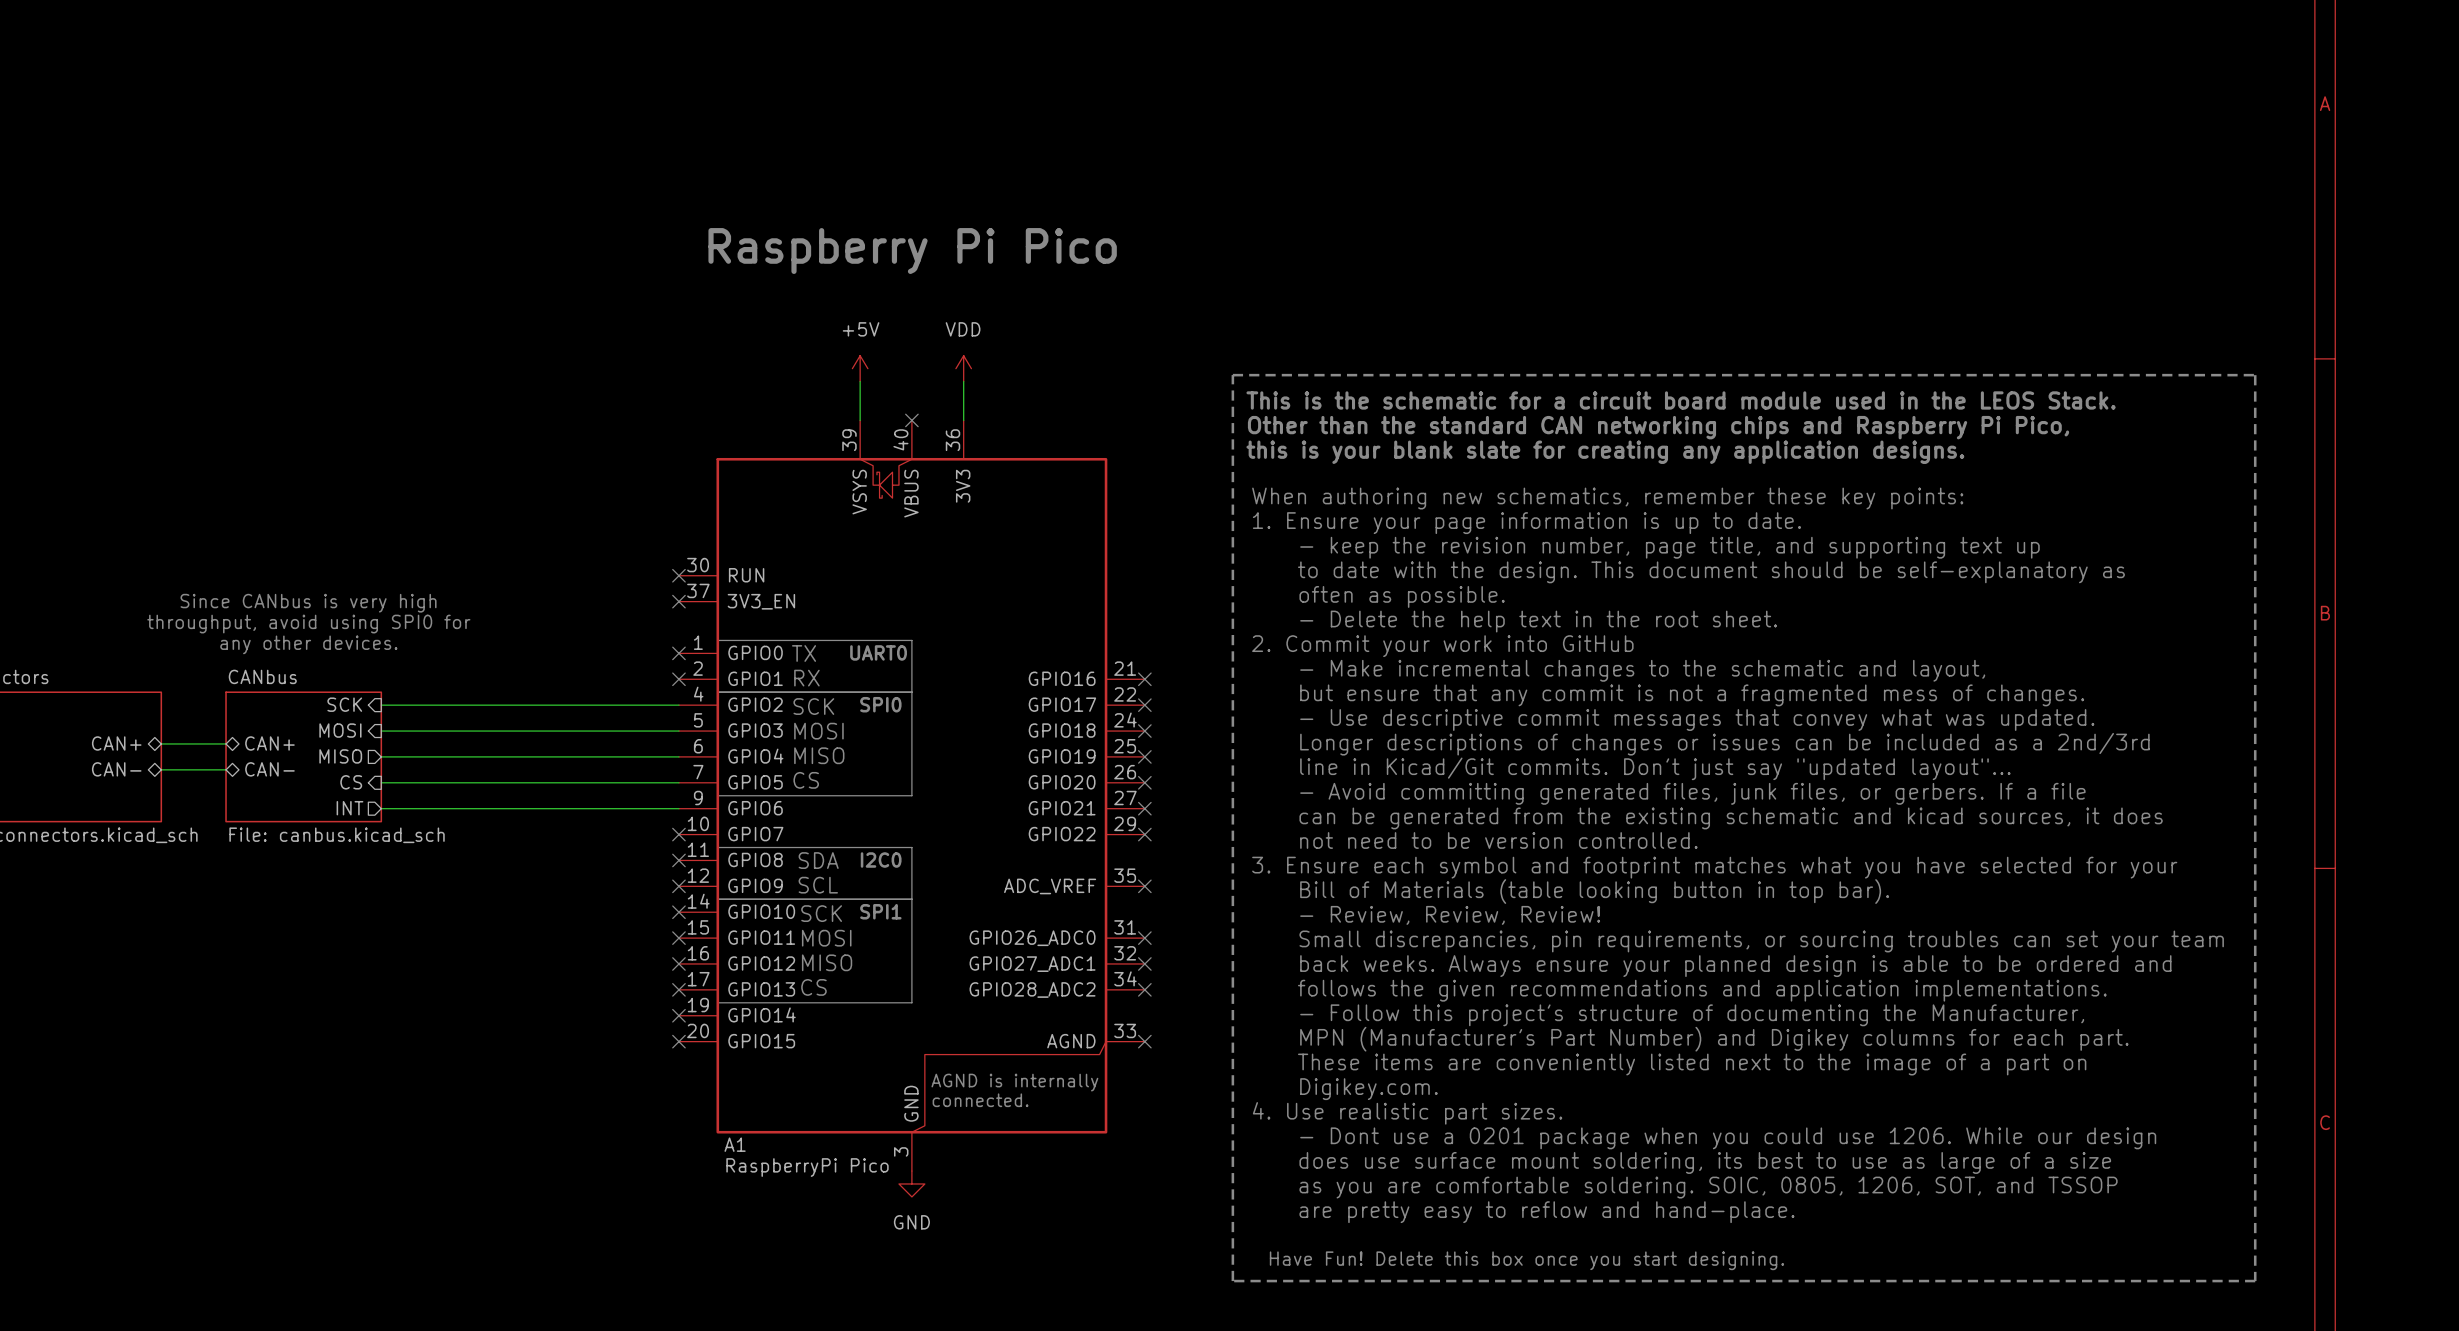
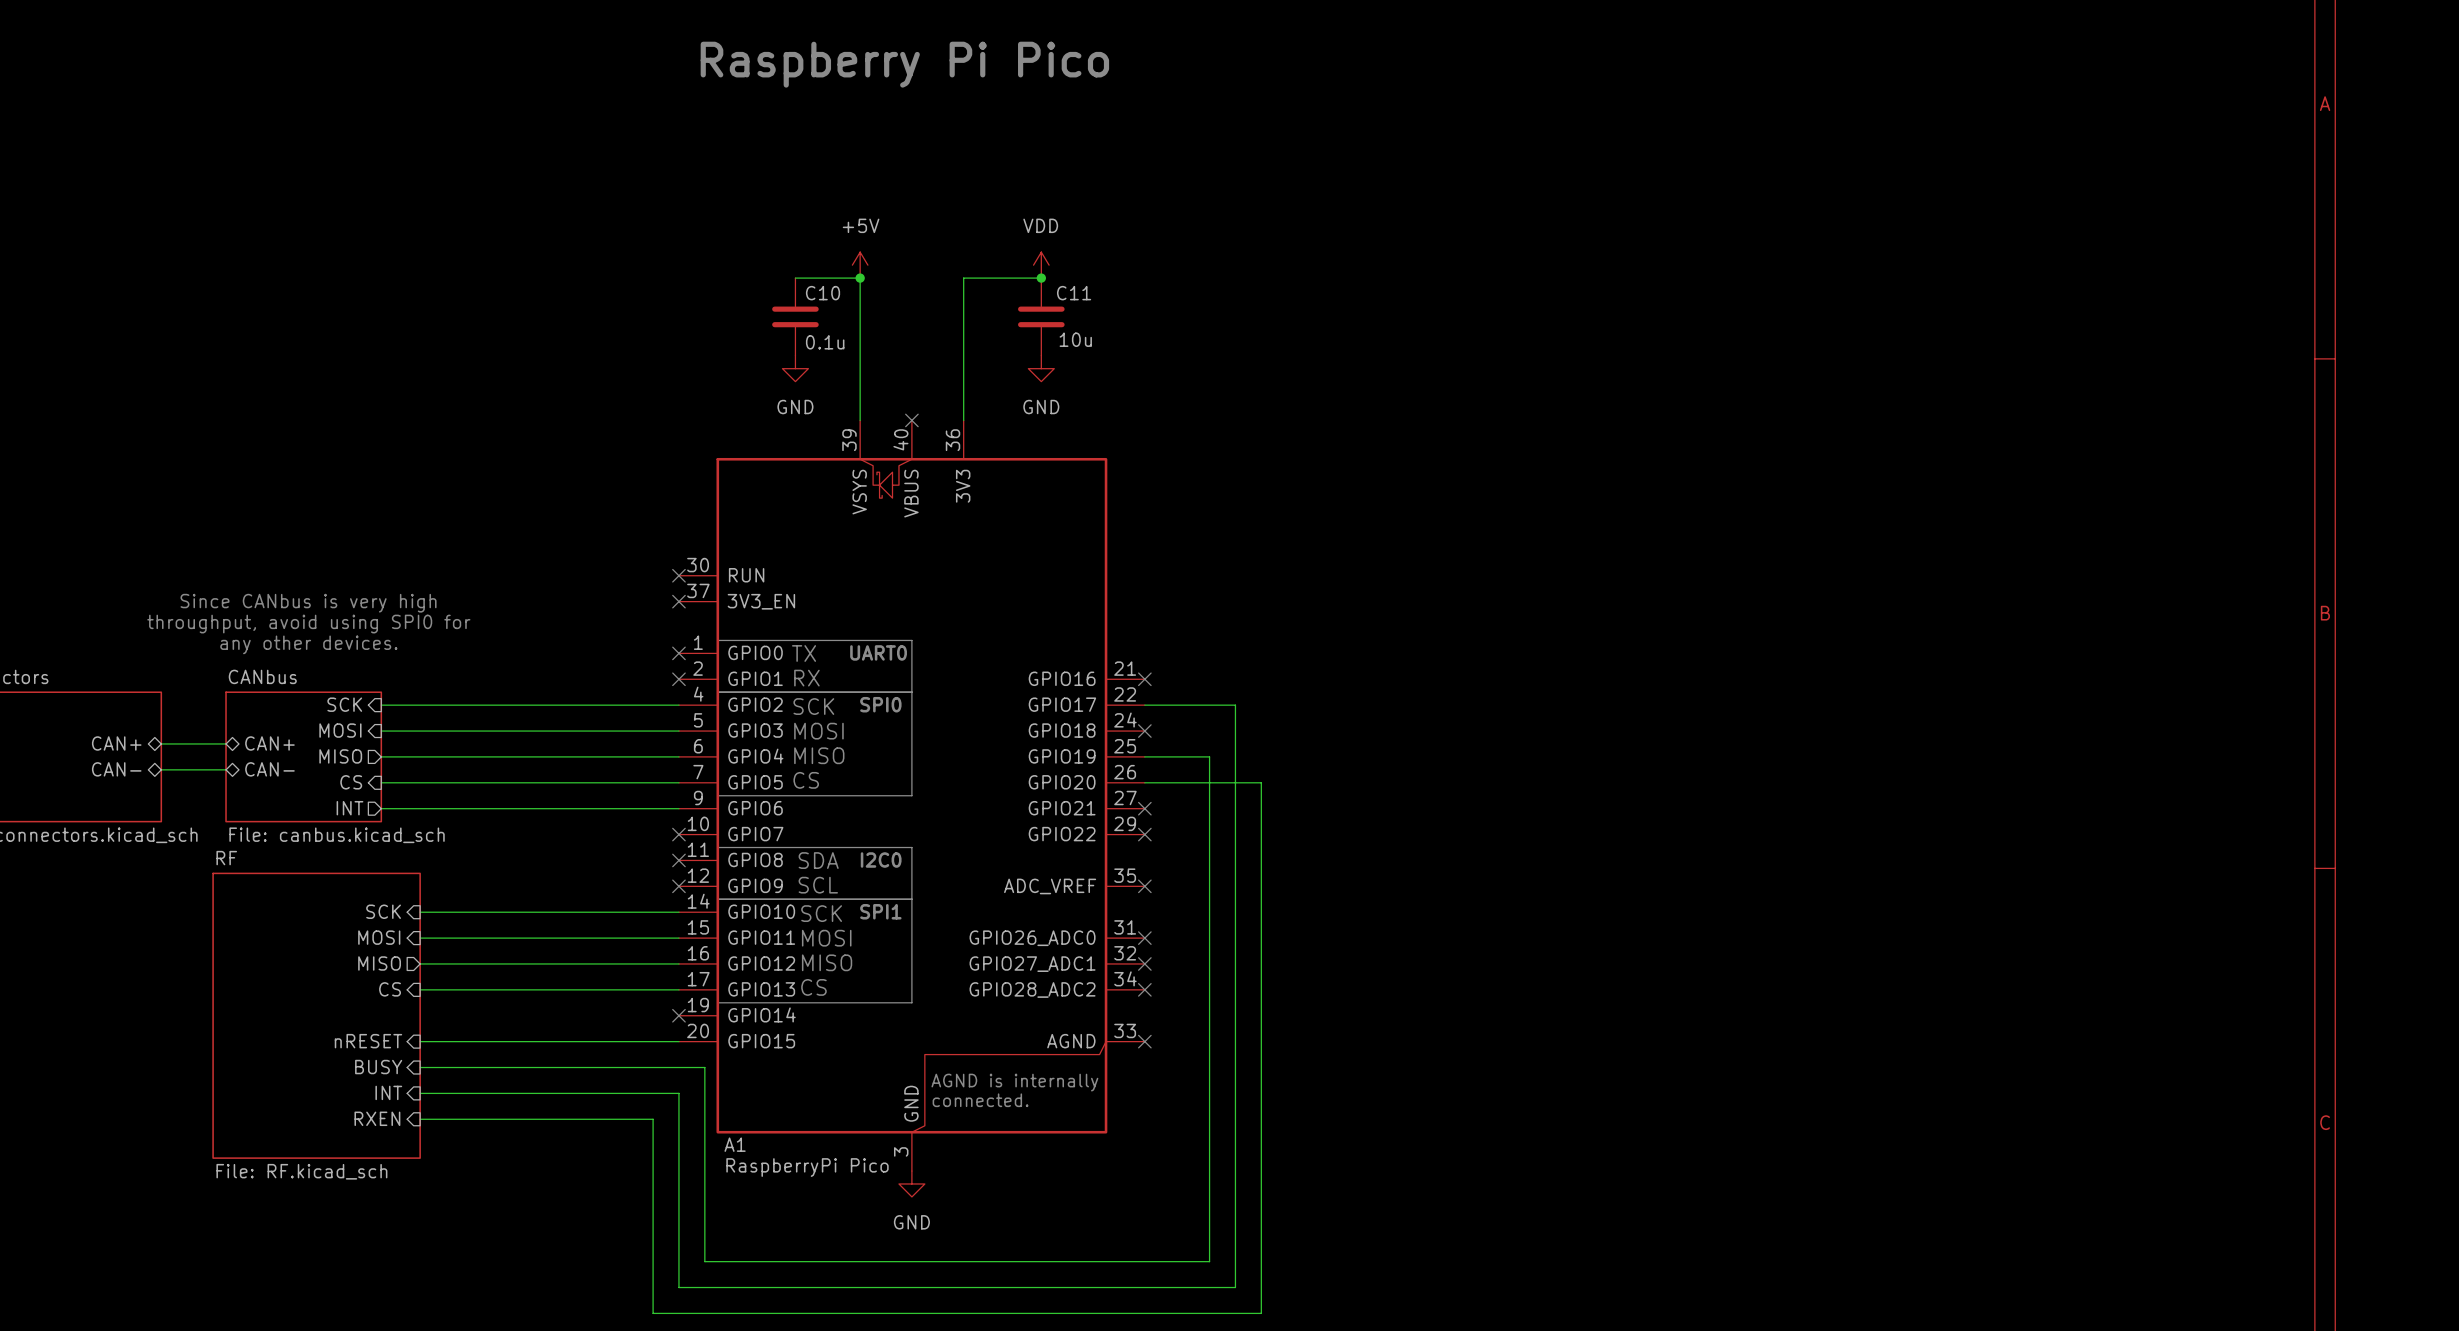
text position: Raspberry Pi Pico (912, 251) -> Raspberry Pi Pico (904, 64)
wire: none -> (795, 278) (860, 278) (860, 381)
junction: none -> (860, 278)
wire: none -> (1041, 278) (963, 278) (963, 381)
junction: none -> (1041, 278)
C10: none -> 0.1u (795, 316)
C11: none -> 10u (1041, 316)
power symbol: none -> GND (795, 368)
power symbol position: +5V (860, 368) -> +5V (860, 265)
power symbol position: VDD (963, 368) -> VDD (1041, 265)
power symbol: none -> GND (1041, 368)
line: (1232, 375) (2255, 375) (2255, 1281) (1232, 1281) (1232, 375) -> none
text: This is the schematic for a circuit board module used in the LEOS Stack. (1681, 400) -> none
text: Other than the standard CAN networking chips and Raspberry Pi Pico, (1658, 427) -> none
text: this is your blank slate for creating any application designs. (1605, 452) -> none
text: When authoring new schematics, remember these key points: (1607, 498) -> none
text: 1. Ensure your page information is up to date. (1526, 523) -> none
text: - keep the revision number, page title, and supporting text up (1669, 547) -> none
text: to date with the design. This document should be self-explanatory as (1711, 572) -> none
text: often as possible. (1402, 596) -> none
text: - Delete the help text in the root sheet. (1538, 621) -> none
text: 2. Commit your work into GitHub (1442, 646) -> none
text: - Make incremental changes to the schematic and layout, (1642, 670) -> none
text: but ensure that any commit is not a fragmented mess of changes. (1692, 695) -> none
wire: none -> (1144, 705) (1235, 705) (1235, 1287) (678, 1287) (678, 1093) (420, 1093)
no-connect mark: (1144, 705) -> none
text: - Use descriptive commit messages that convey what was updated. (1697, 719) -> none
text: Longer descriptions of changes or issues can be included as a 2nd/3rd (1724, 744) -> none
wire: none -> (1144, 756) (1209, 756) (1209, 1261) (704, 1261) (704, 1067) (420, 1067)
no-connect mark: (1144, 756) -> none
text: line in Kicad/Git commits. Don't just say "updated layout"... (1655, 768) -> none
wire: none -> (1144, 782) (1261, 782) (1261, 1313) (653, 1313) (653, 1119) (420, 1119)
no-connect mark: (1144, 782) -> none
text: - Avoid committing generated files, junk files, or gerbers. If a file (1692, 793) -> none
text: can be generated from the existing schematic and kicad sources, it does (1731, 818) -> none
text: not need to be version controlled. (1498, 840) -> none
text: 3. Ensure each symbol and footprint matches what you have selected for your (1714, 867) -> none
text: Bill of Materials (table looking button in top bar). (1594, 891) -> none
sheet pin: none -> SCK (383, 911)
wire: none -> (420, 912) (678, 912)
no-connect mark: (678, 912) -> none
text: - Review, Review, Review! (1450, 915) -> none
sheet pin: none -> MOSI (379, 937)
wire: none -> (420, 938) (678, 938)
no-connect mark: (678, 938) -> none
text: Small discrepancies, pin requirements, or sourcing troubles can set your team (1761, 941) -> none
sheet pin: none -> MISO (379, 963)
wire: none -> (420, 963) (678, 963)
no-connect mark: (678, 963) -> none
text: back weeks. Always ensure your planned design is able to be ordered and (1735, 966) -> none
sheet pin: none -> CS (390, 989)
wire: none -> (420, 989) (678, 989)
no-connect mark: (678, 989) -> none
text: follows the given recommendations and application implementations. (1702, 990) -> none
sheet RF: none -> File: RF.kicad_sch (316, 1015)
text: - Follow this project's structure of documenting the Manufacturer, (1692, 1015) -> none
text: MPN (Manufacturer's Part Number) and Digikey columns for each part. (1714, 1039) -> none
sheet pin: none -> nRESET (368, 1041)
wire: none -> (420, 1041) (678, 1041)
no-connect mark: (678, 1041) -> none
text: These items are conveniently listed next to the image of a part on (1692, 1064) -> none
sheet pin: none -> BUSY (378, 1067)
text: Digikey.com. (1368, 1089) -> none
sheet pin: none -> INT (388, 1092)
text: 4. Use realistic part sizes. (1407, 1113) -> none
sheet pin: none -> RXEN (377, 1118)
text: - Dont use a 0201 package when you could use 1206. While our design (1728, 1138) -> none
text: does use surface mount soldering, its best to use as large of a size (1705, 1162) -> none
text: as you are comfortable soldering. SOIC, 0805, 1206, SOT, and TSSOP (1708, 1187) -> none
text: are pretty easy to reflow and hand-place. (1546, 1212) -> none
text: Have Fun! Delete this box once you start designing. (1526, 1260) -> none

